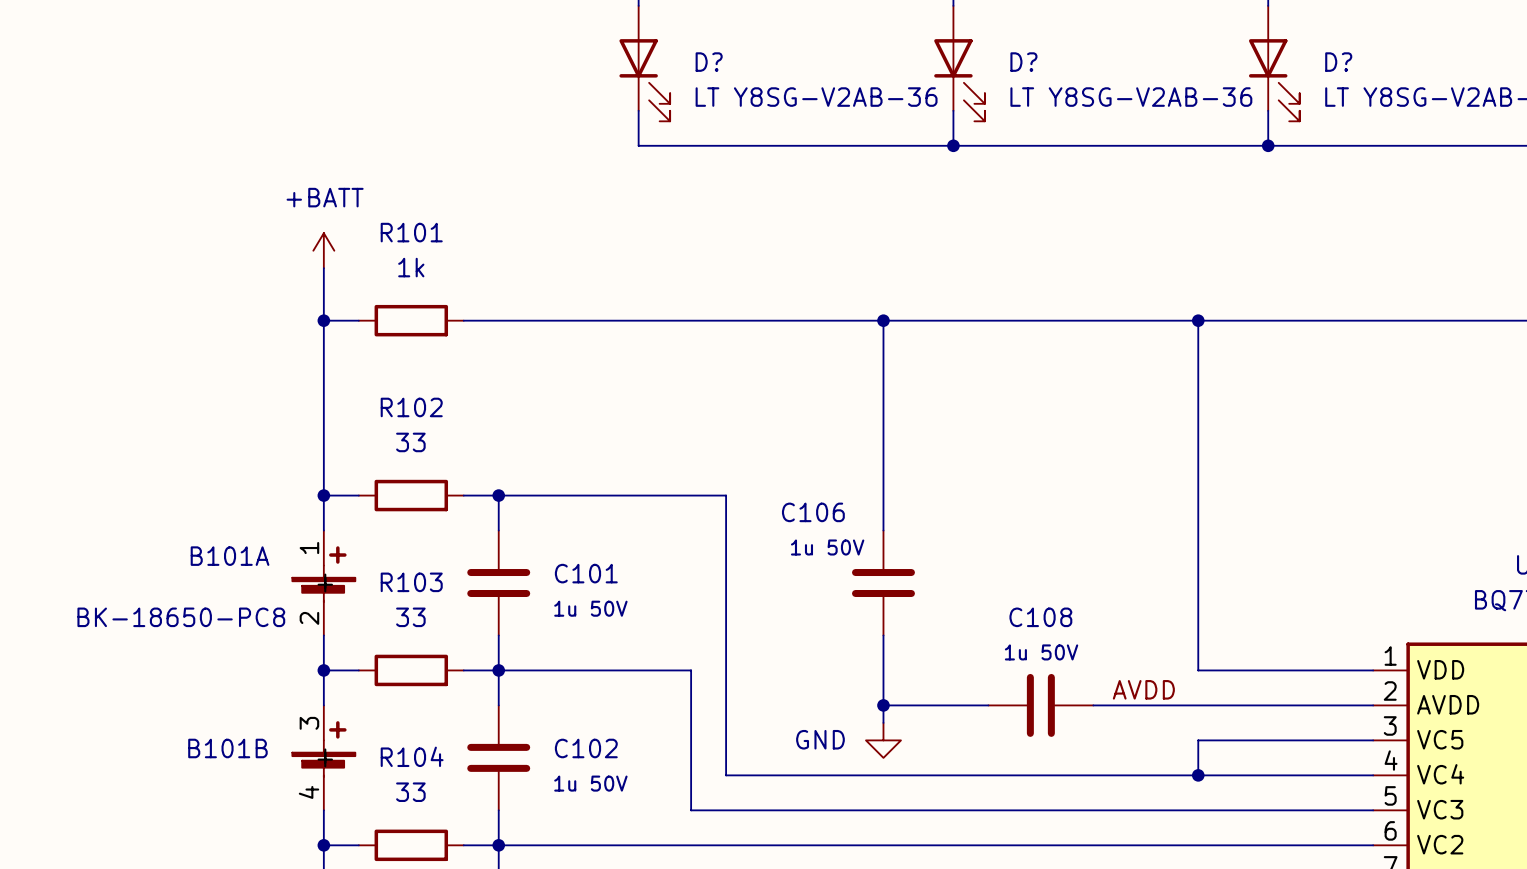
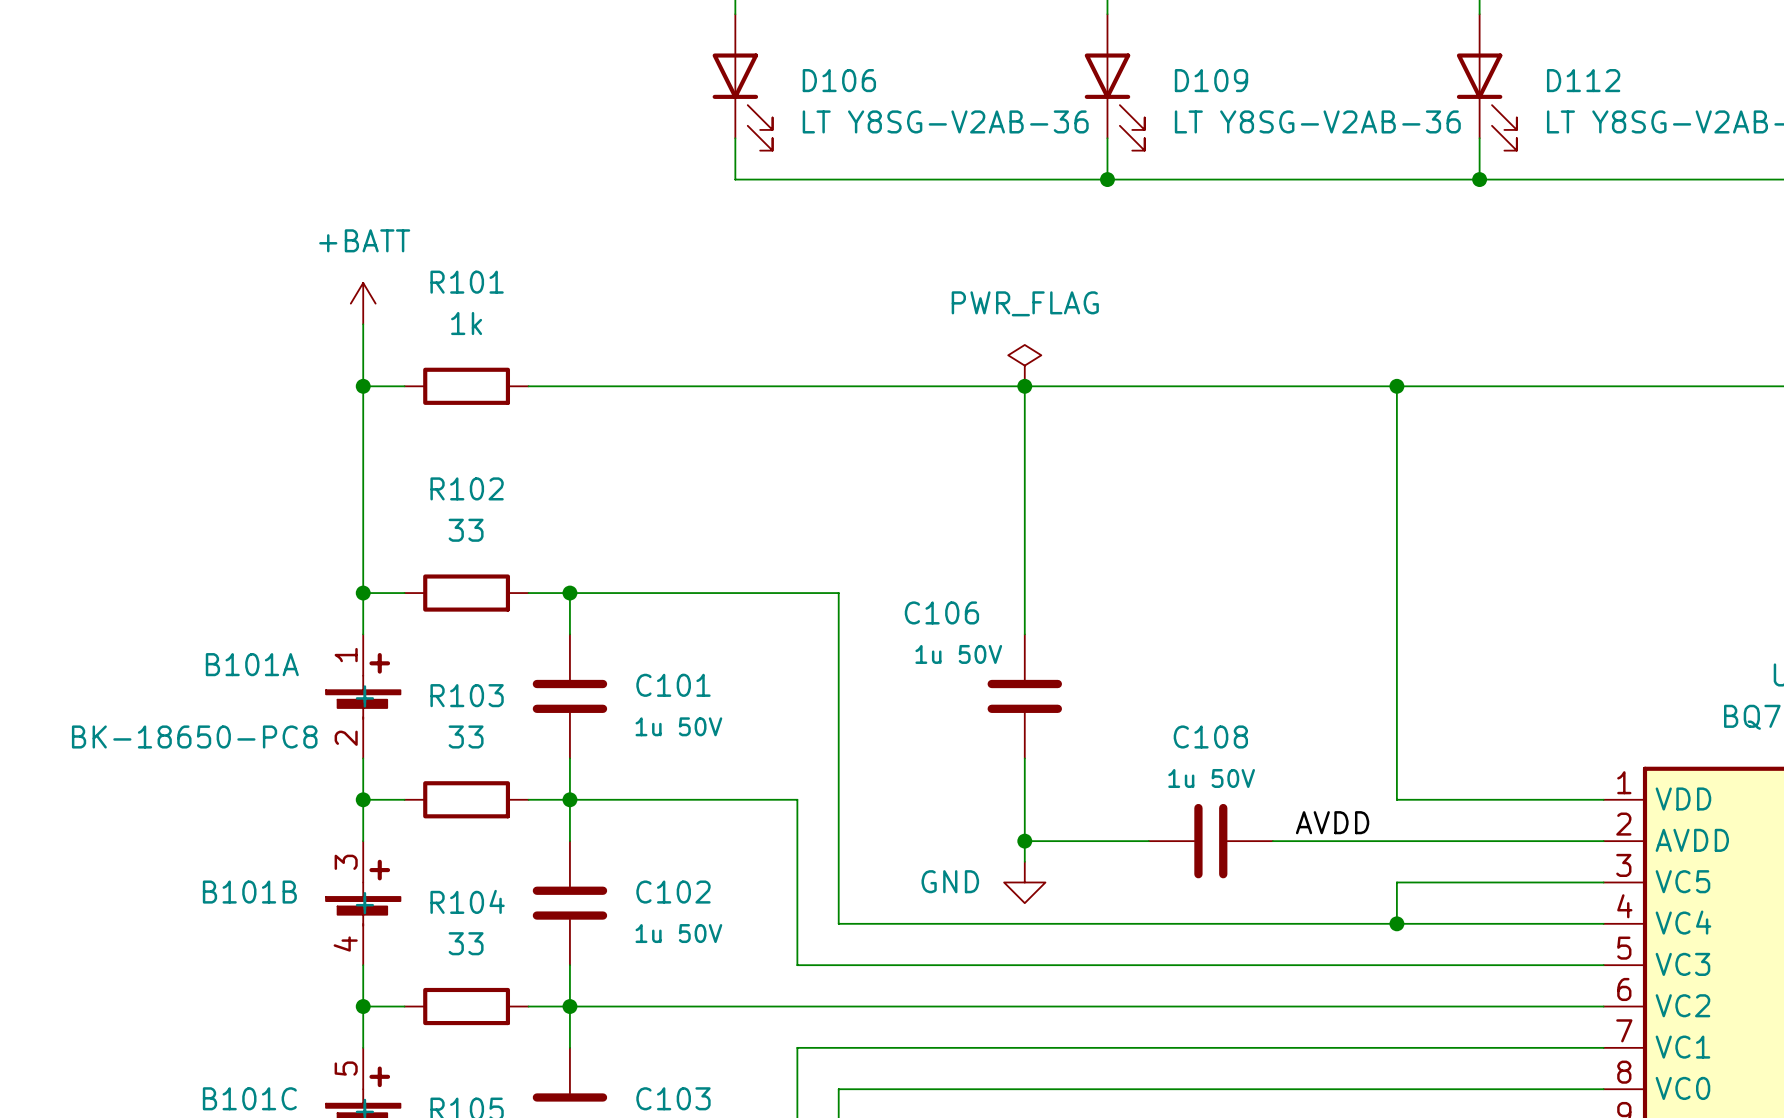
D? name: D? (709, 62) -> D106 (839, 80)
D? name: D? (1023, 62) -> D109 (1211, 80)
D? name: D? (1338, 62) -> D112 (1583, 80)
power symbol: none -> PWR_FLAG (1024, 365)

